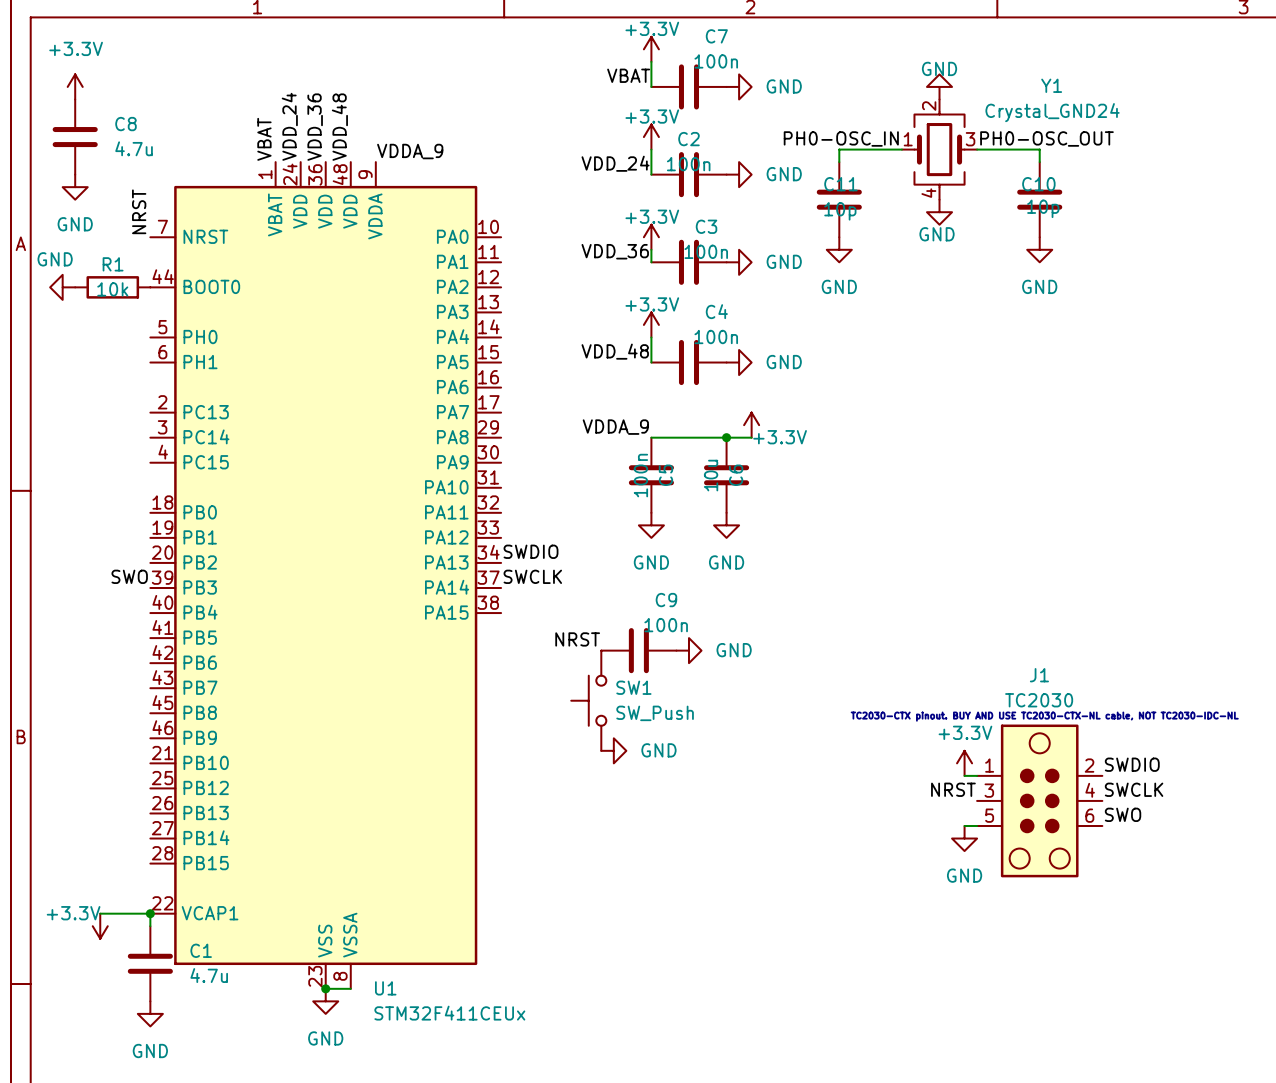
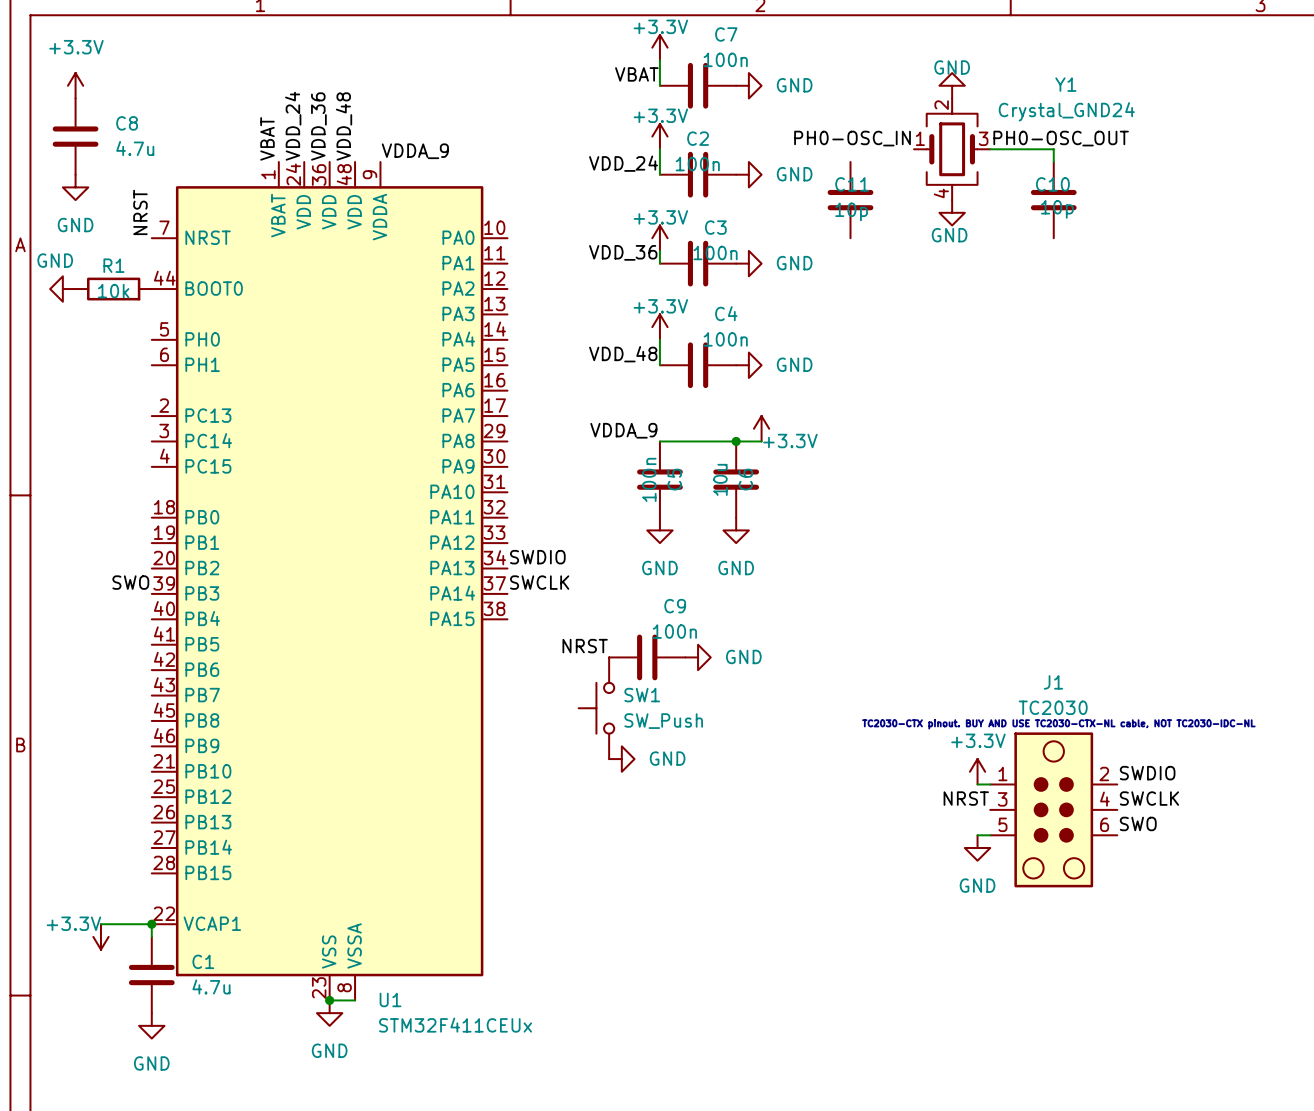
wire: (901, 149) (839, 149) (839, 162) -> none
power symbol: GND (839, 249) -> none
power symbol: GND (1039, 249) -> none

